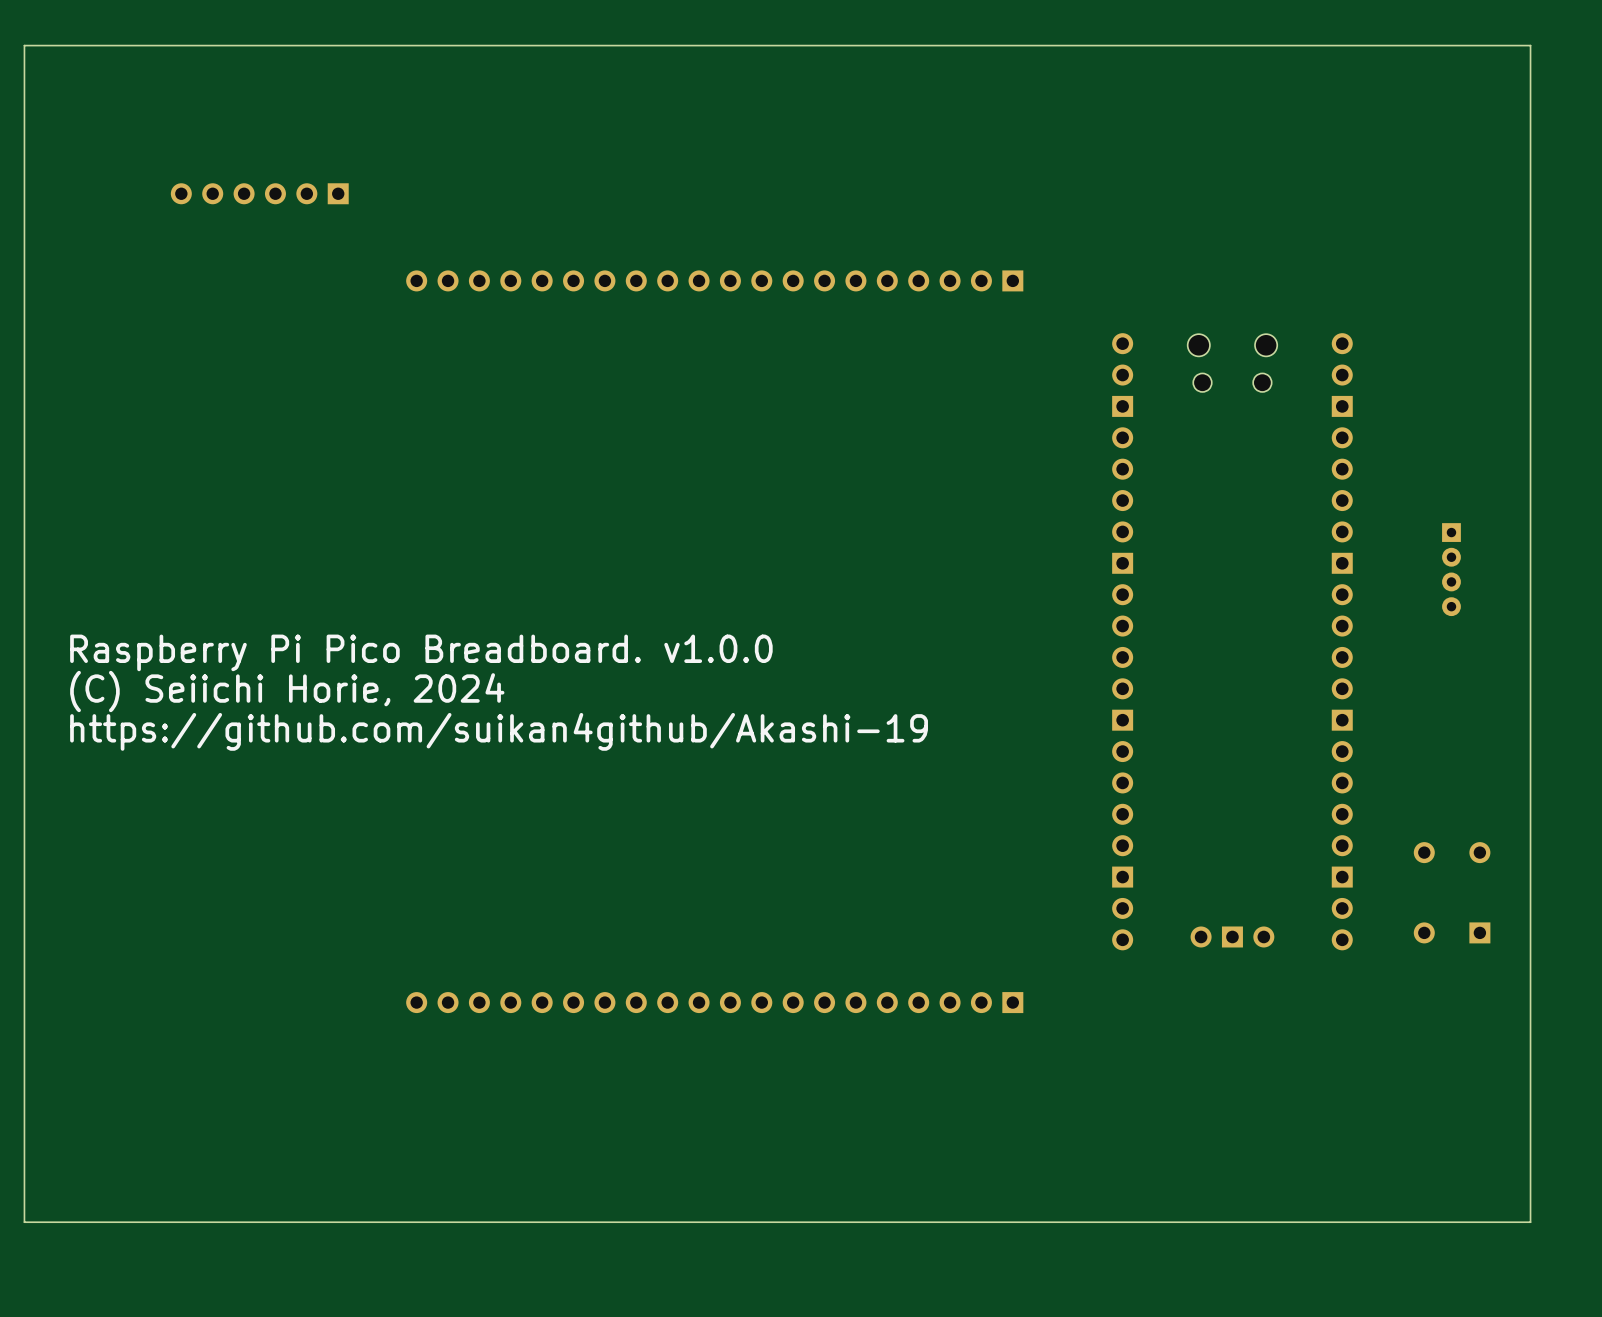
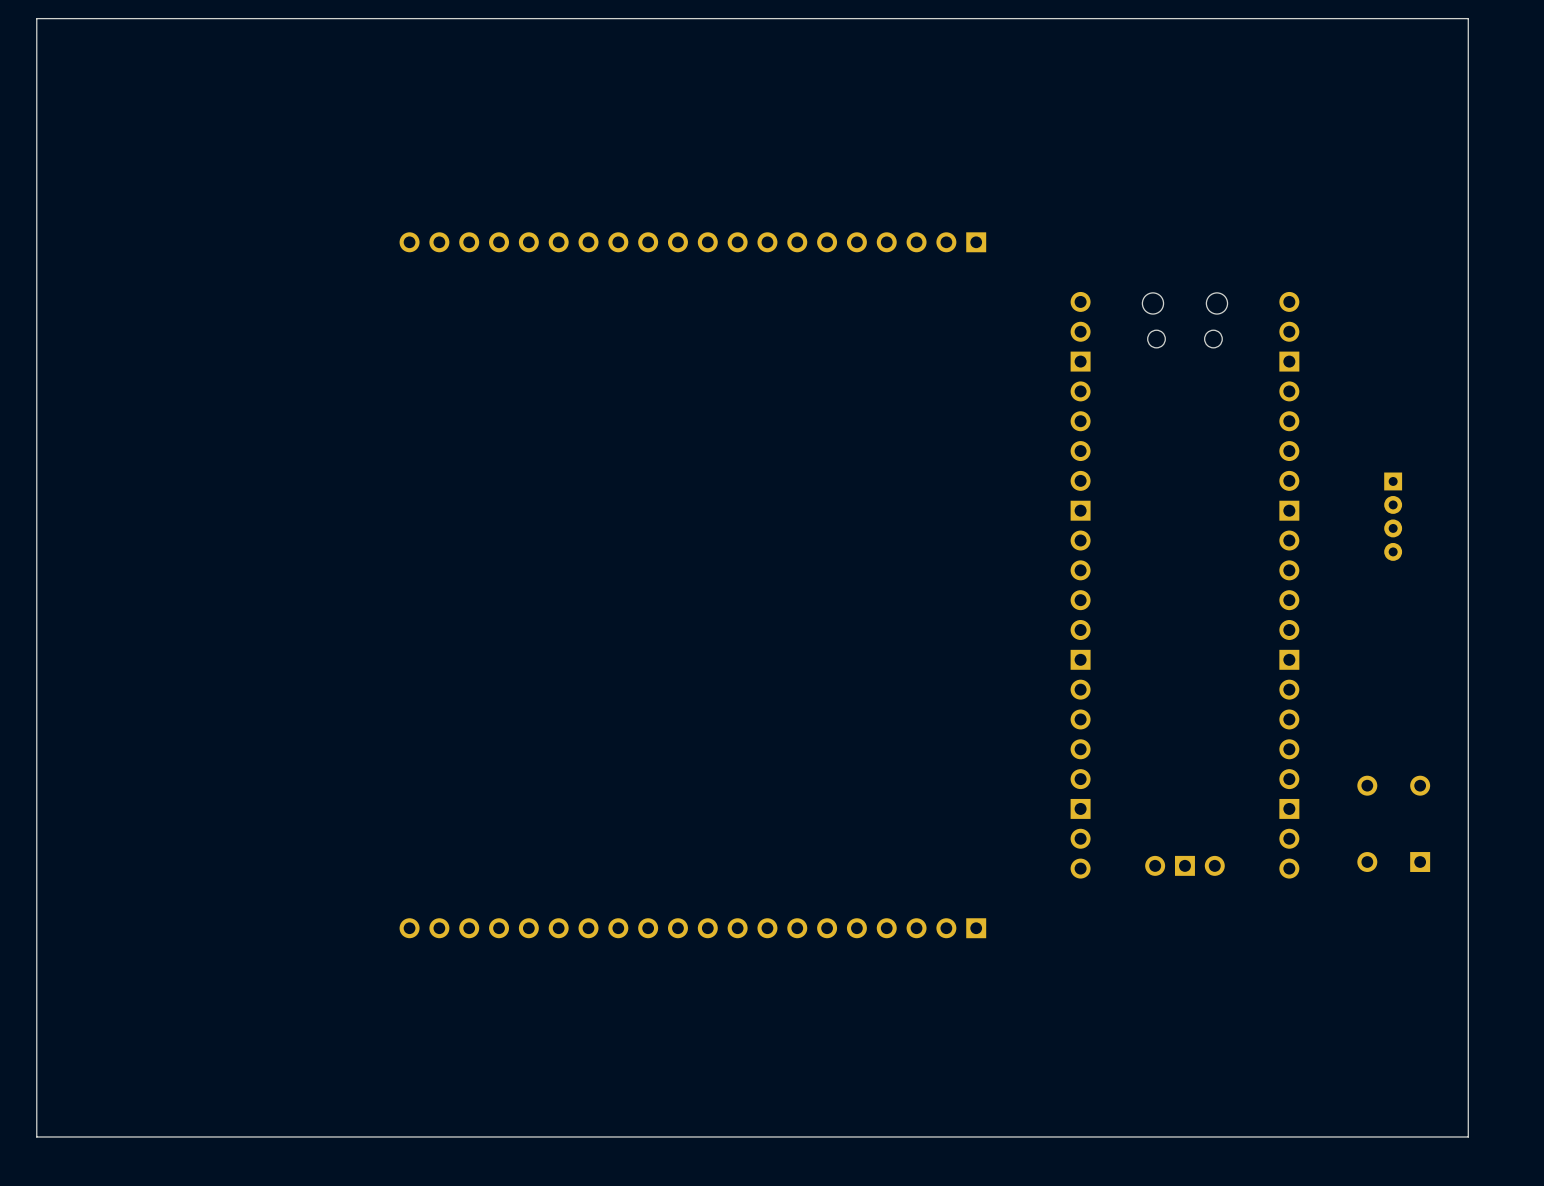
part: (259, 193) -> none
text: Raspberry Pi Pico Breadboard. v1.0.0 (421, 652) -> none
text: (C) Seiichi Horie, 2024 (287, 691) -> none
text: https://github.com/suikan4github/Akashi-19 (499, 731) -> none

